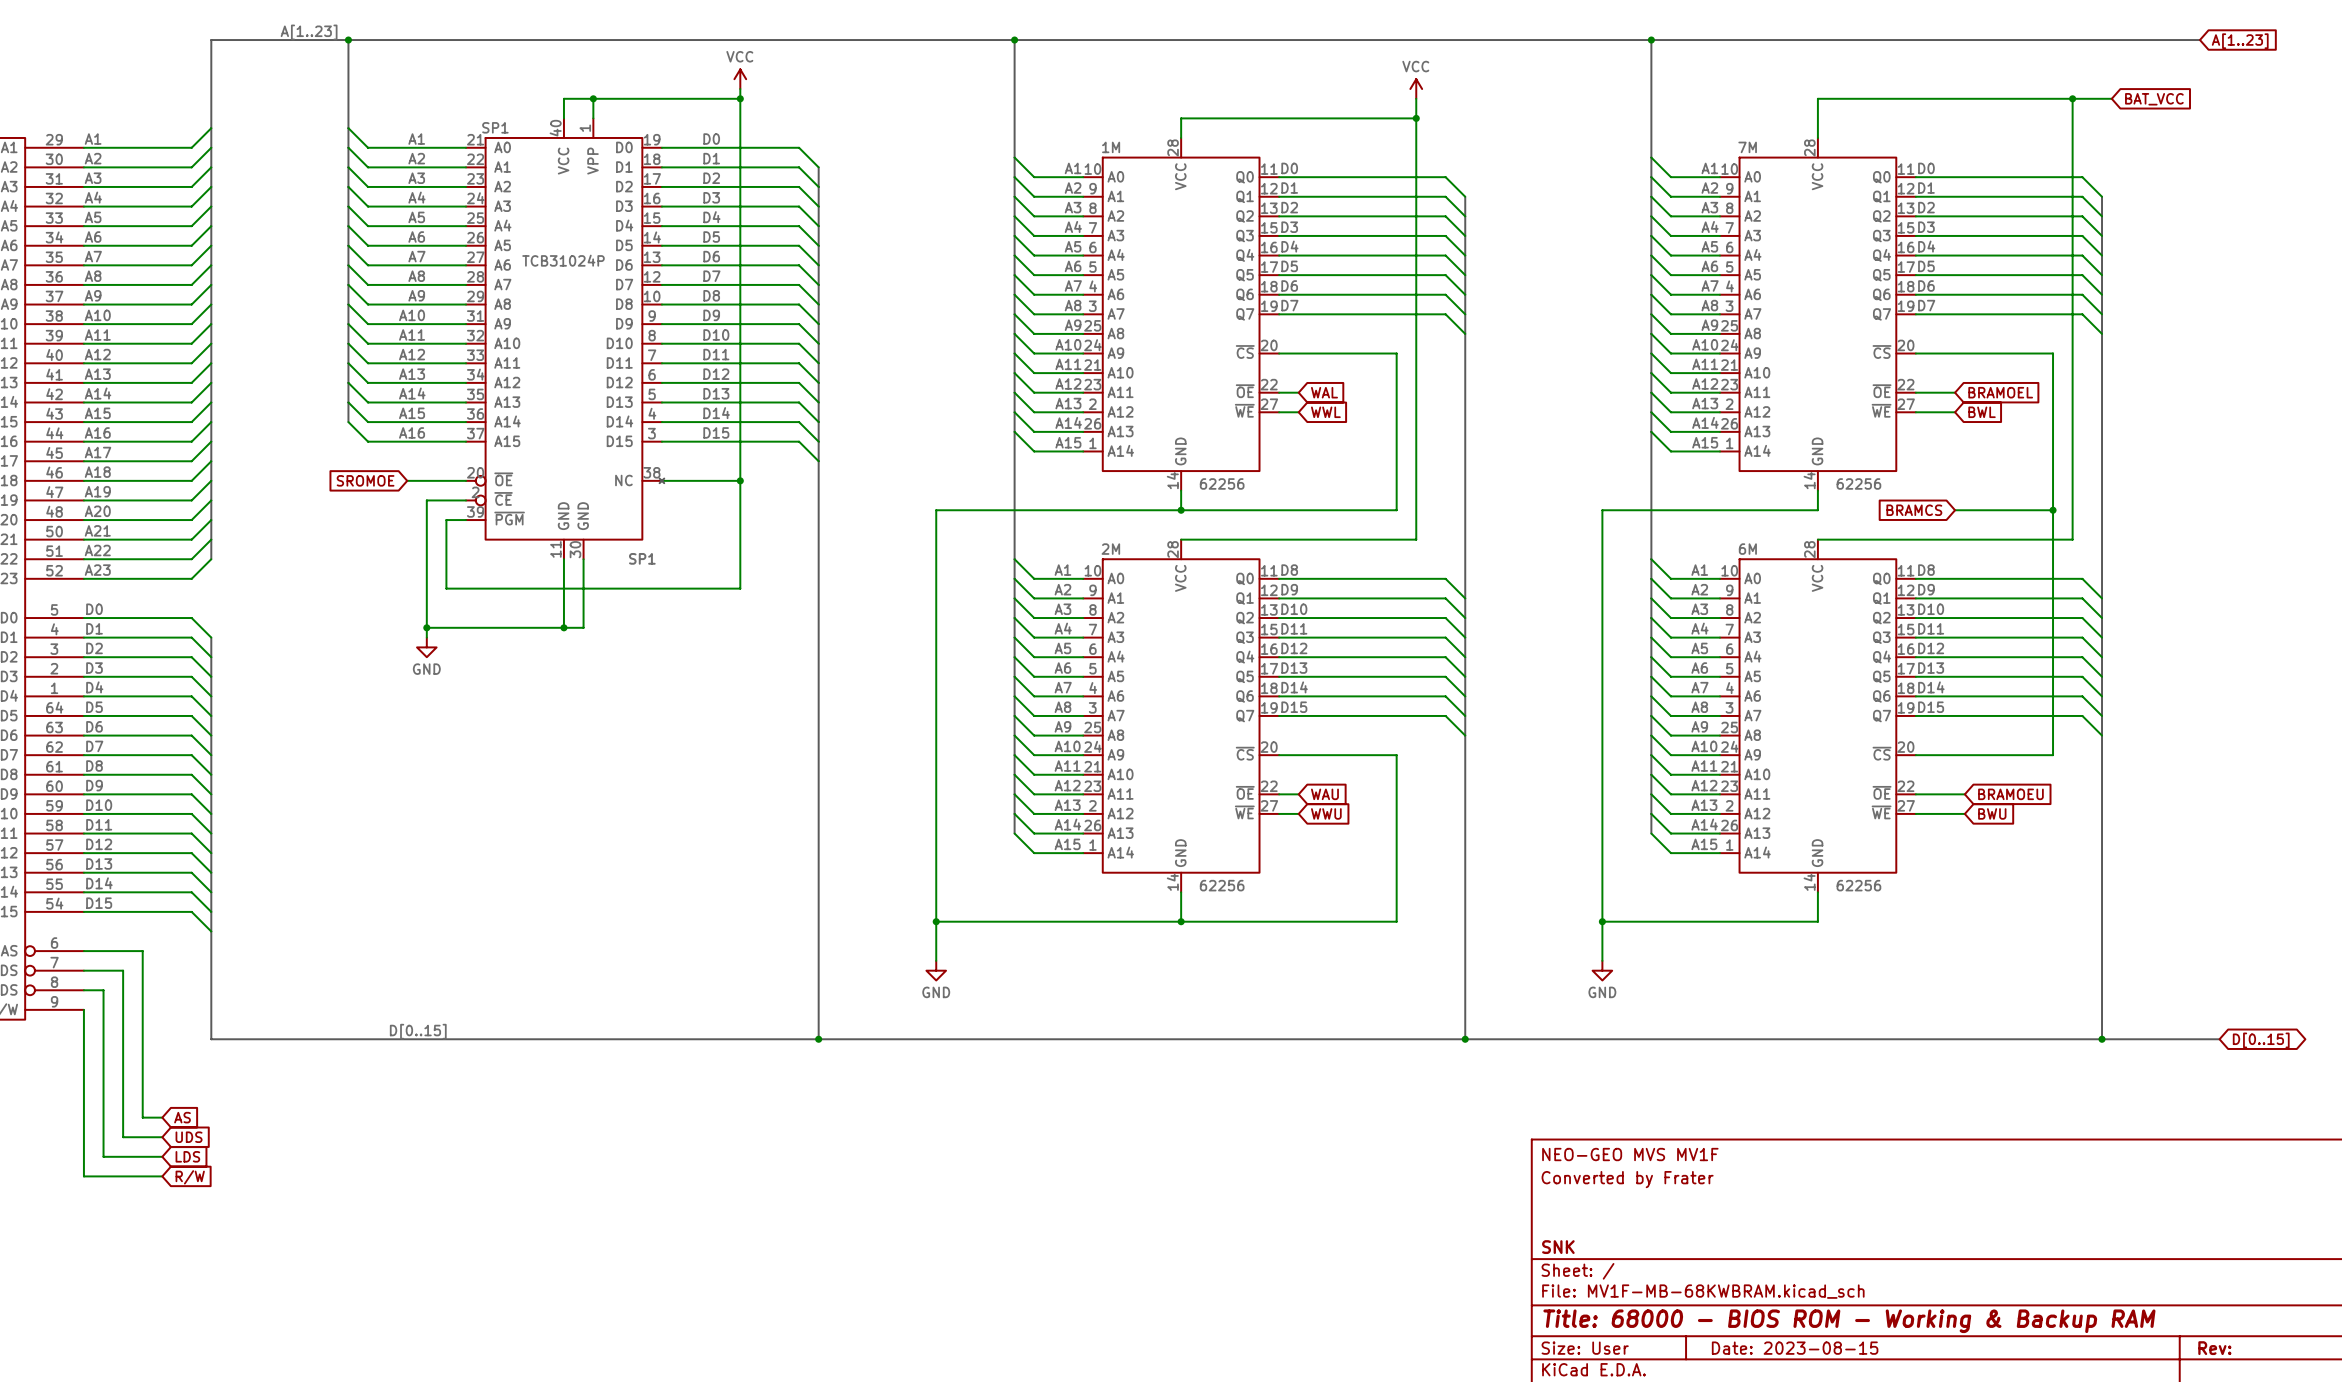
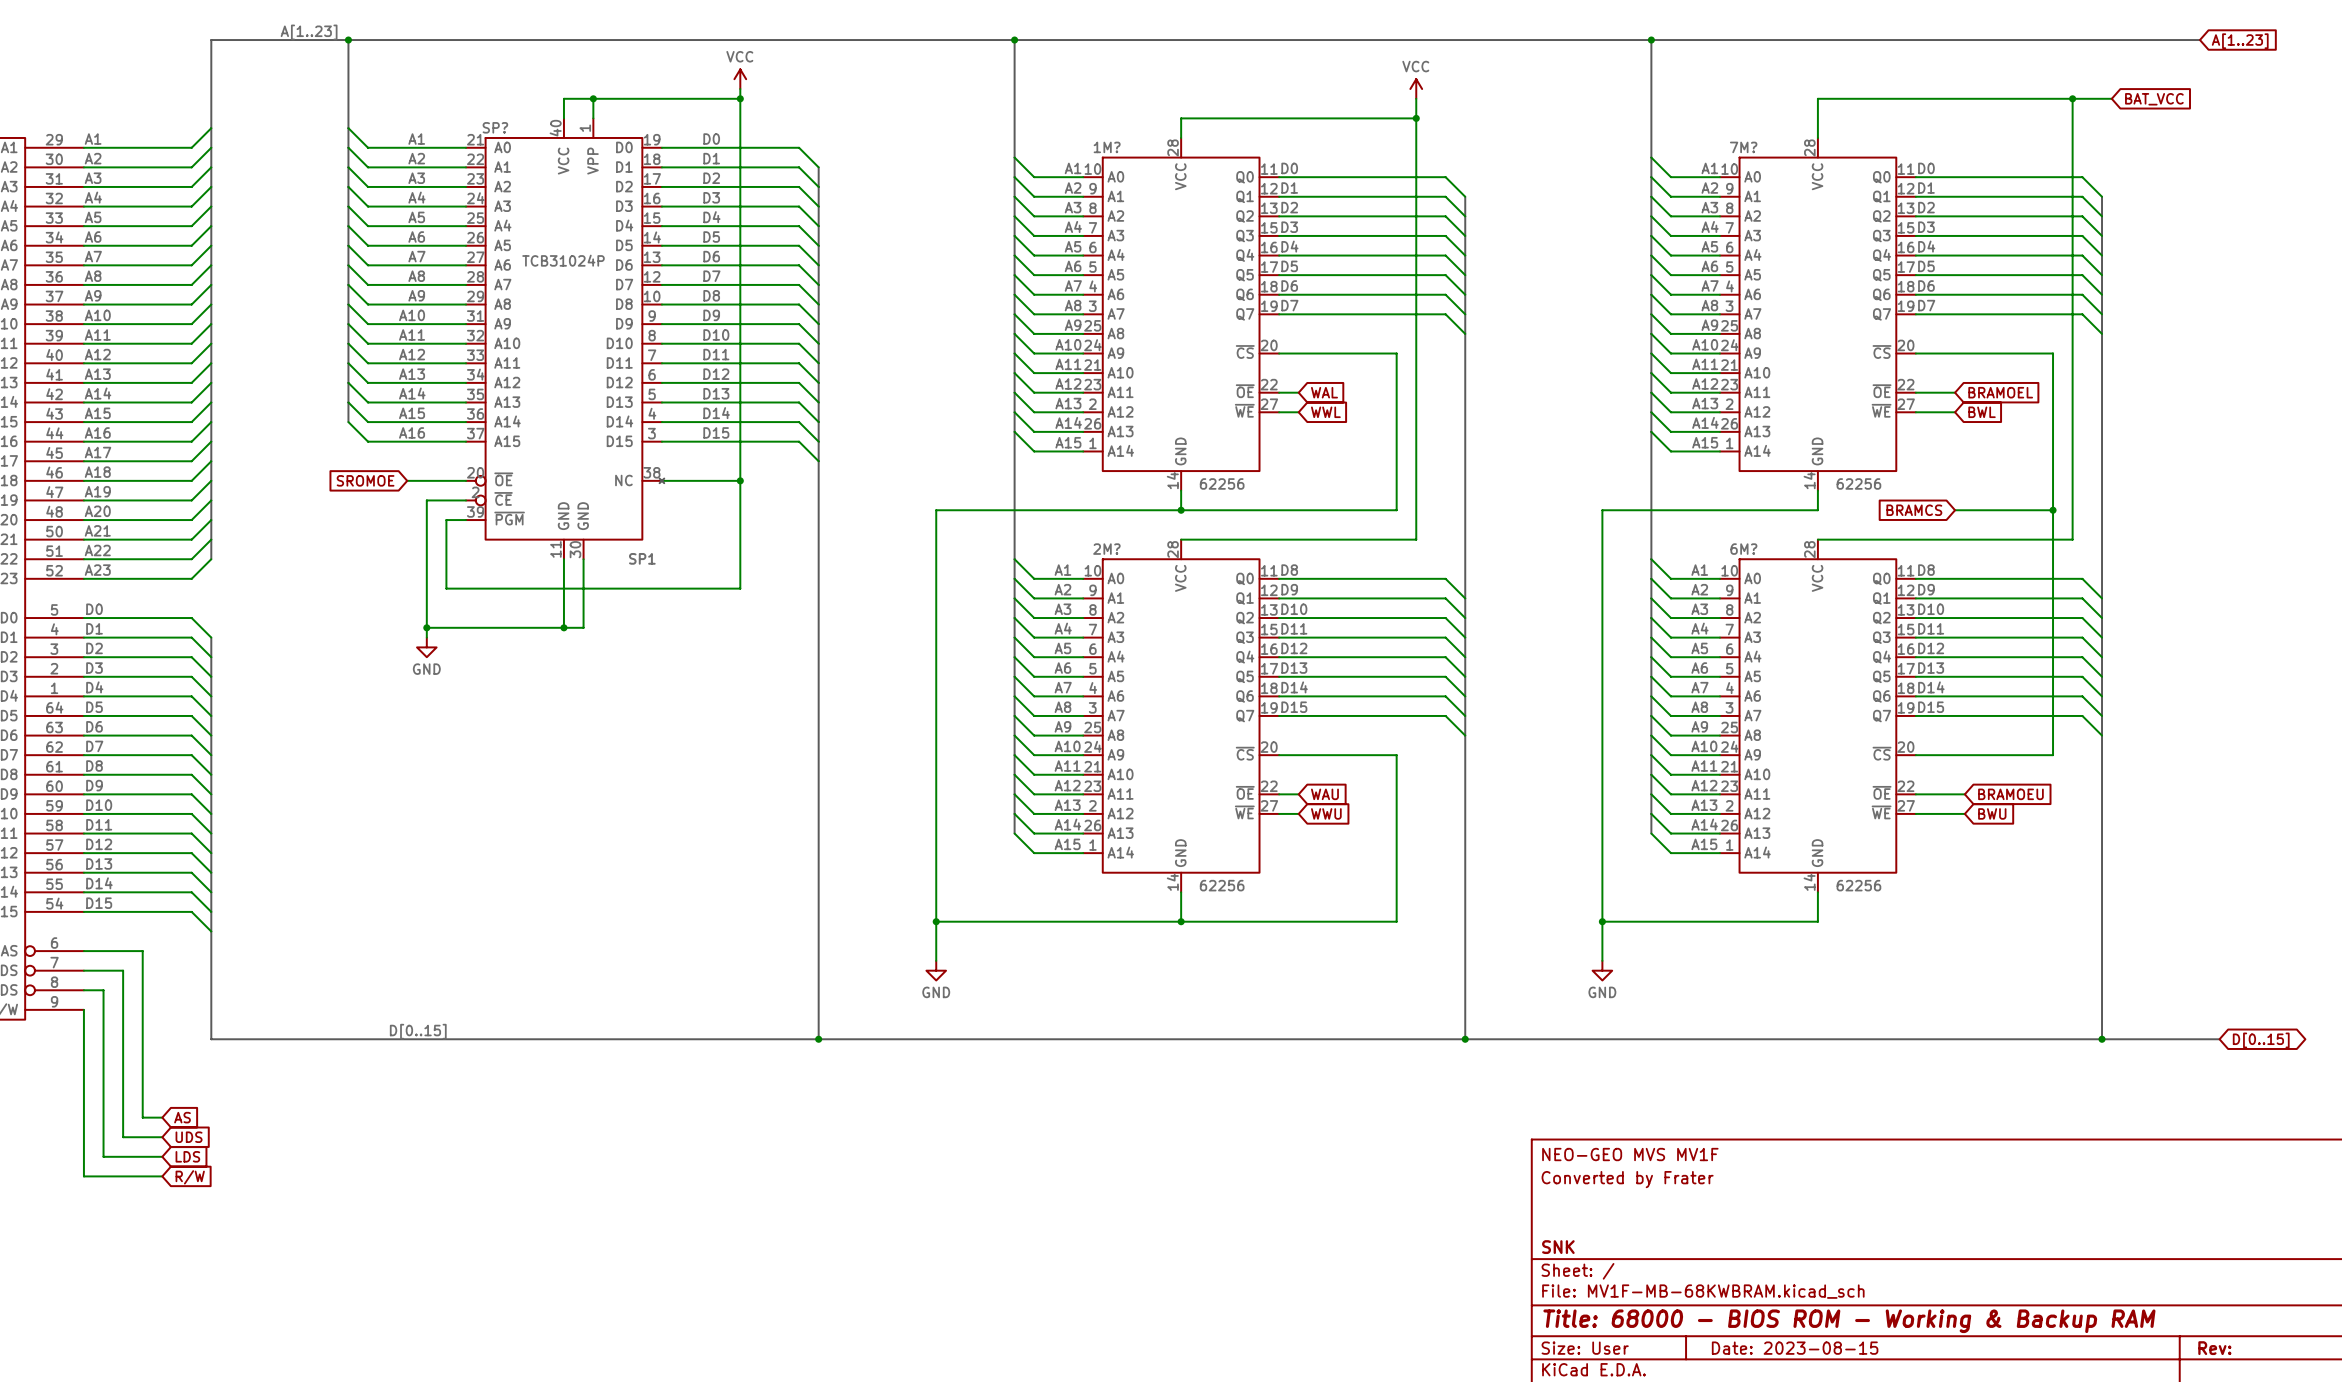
SP1 name: SP1 (495, 127) -> SP? (495, 127)
1M name: 1M (1111, 147) -> 1M? (1107, 147)
7M name: 7M (1747, 147) -> 7M? (1743, 147)
2M name: 2M (1110, 549) -> 2M? (1106, 549)
6M name: 6M (1747, 549) -> 6M? (1743, 549)

